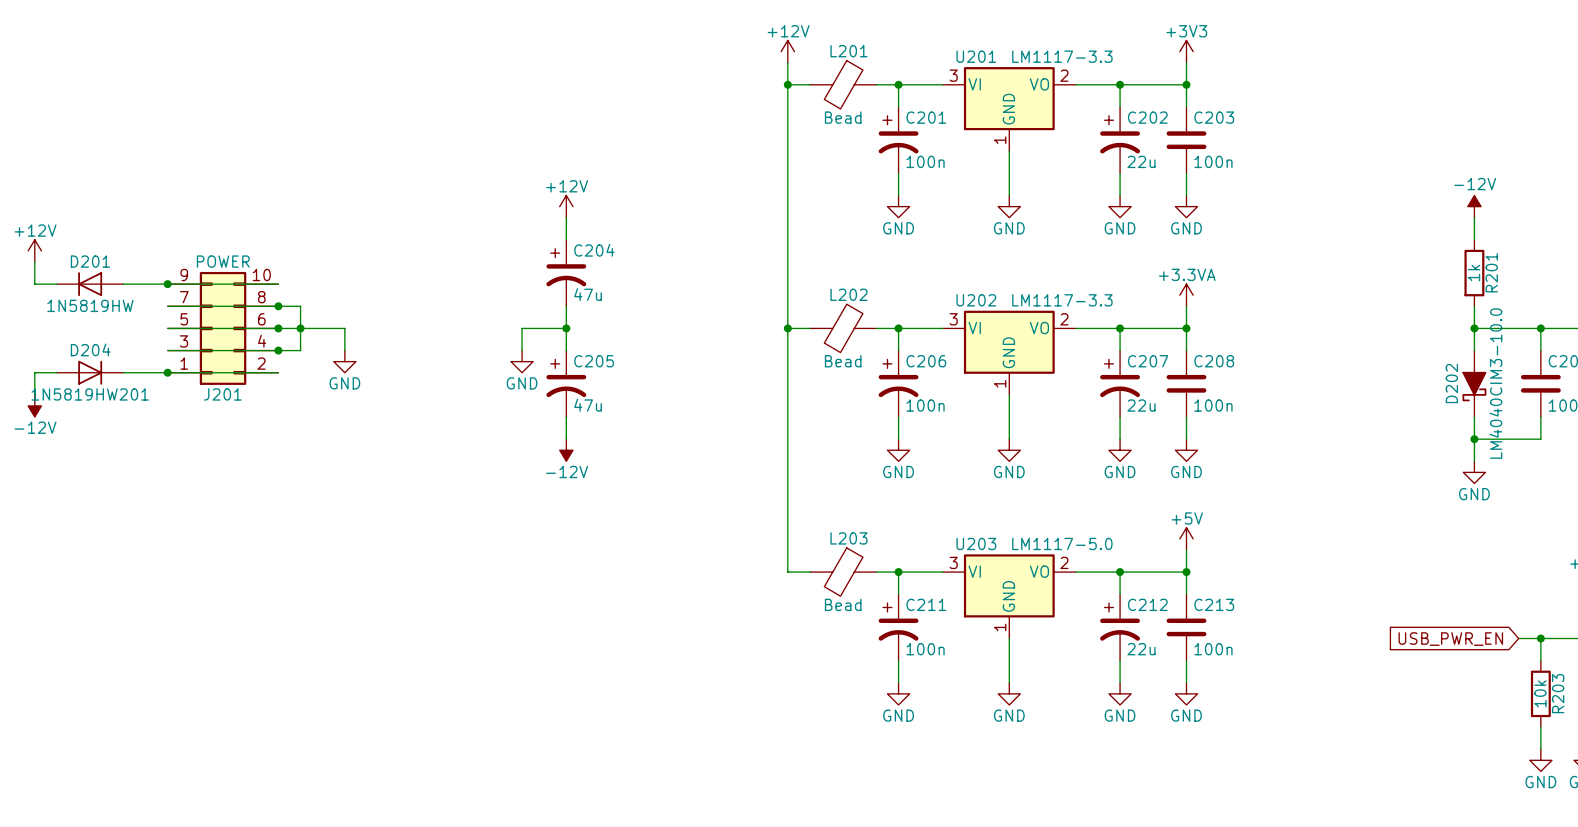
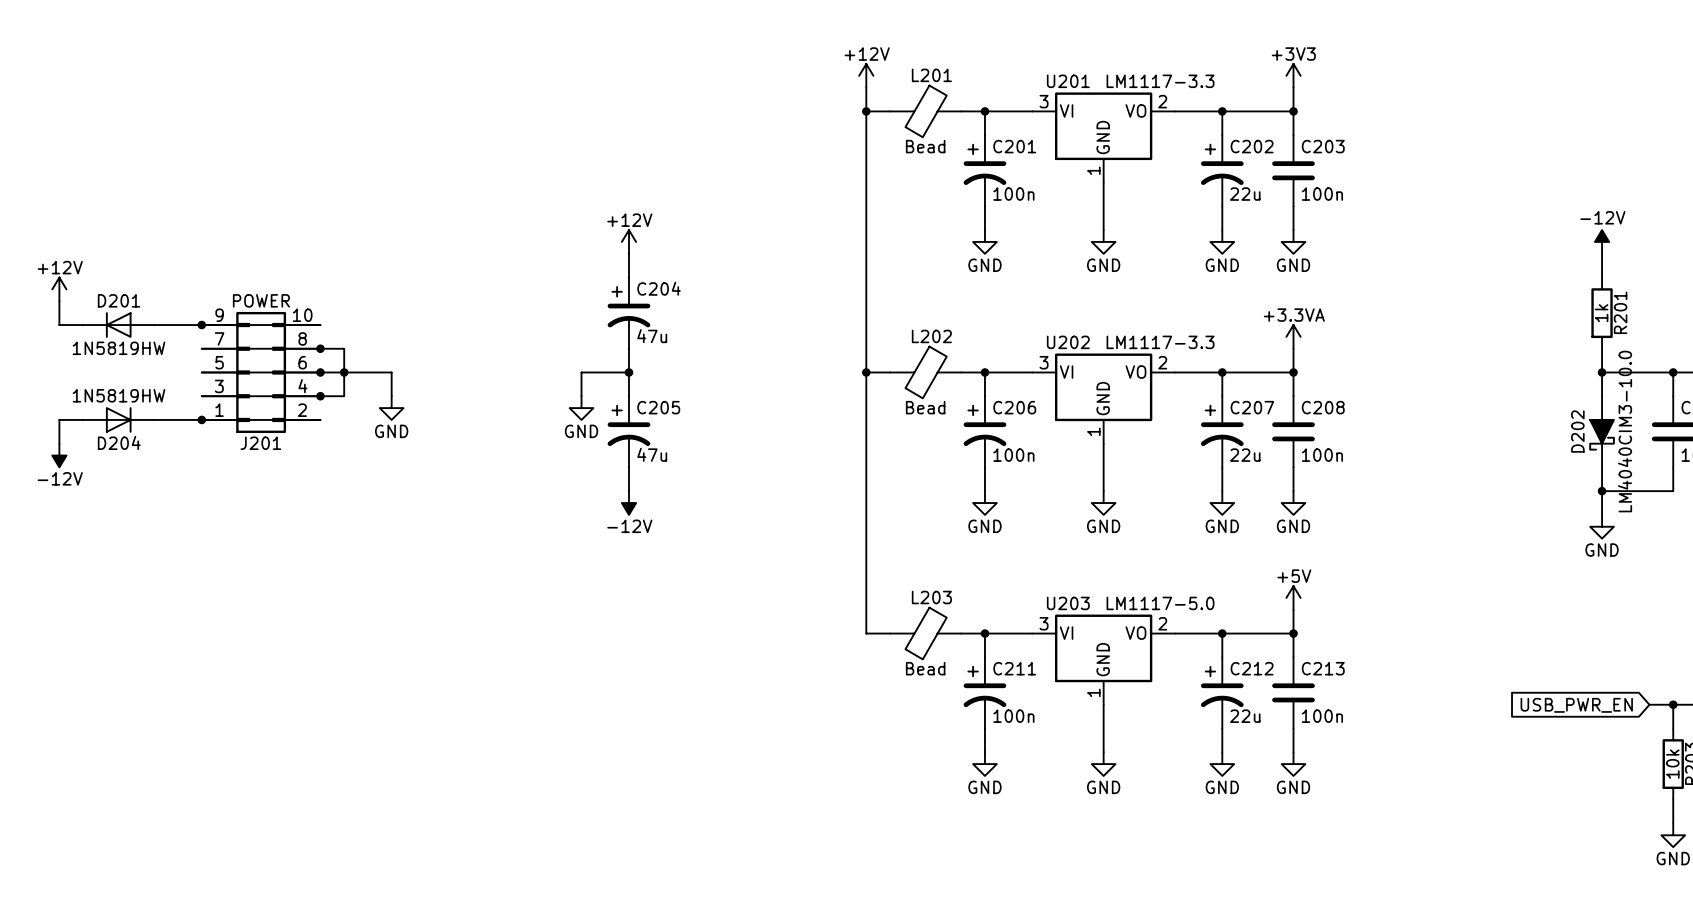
1N5819HW201 value: D204 (90, 349) -> 1N5819HW (119, 395)
1N5819HW201 name: 1N5819HW201 (90, 394) -> D204 (119, 442)

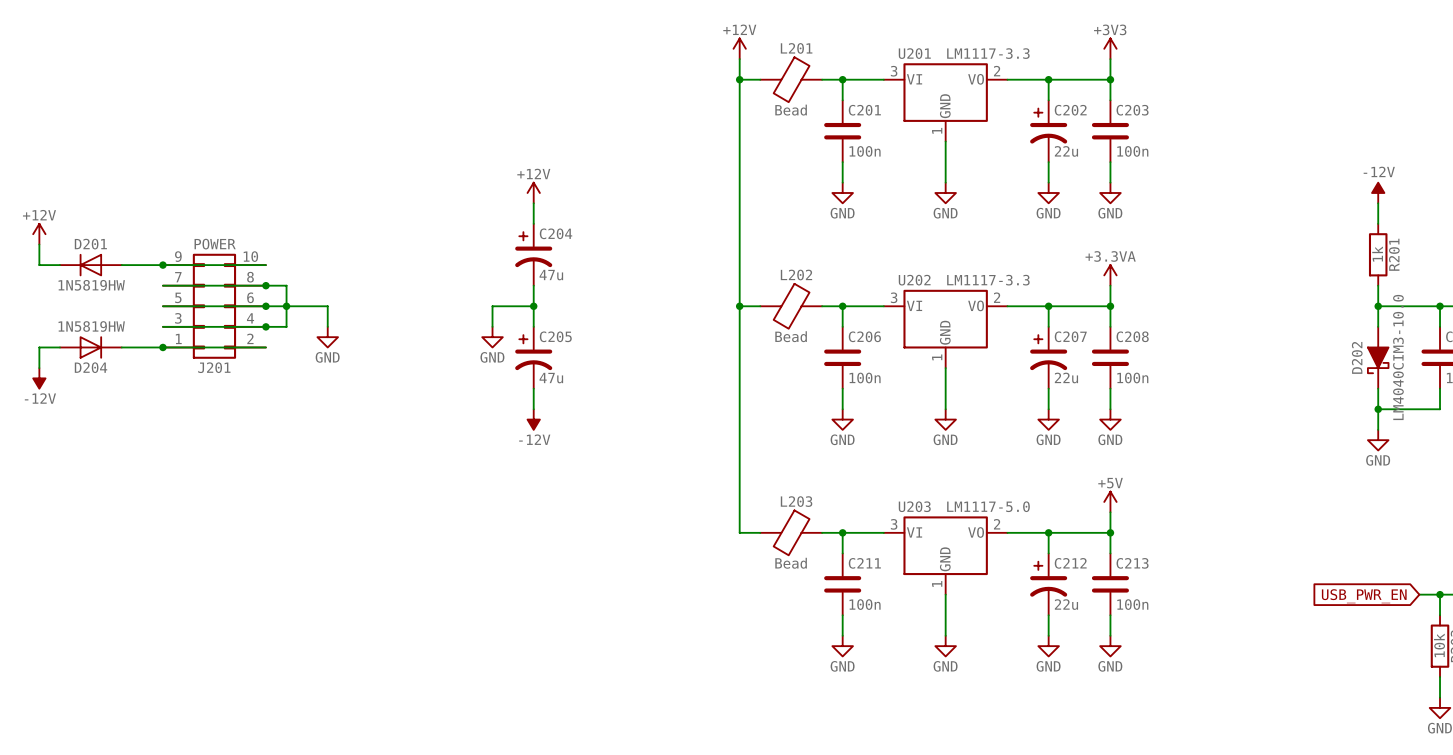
C201 symbol: [963, 135, 1007, 207] -> [824, 100, 862, 163]
C206 symbol: [963, 396, 1007, 468] -> [824, 326, 862, 389]
C211 symbol: [963, 657, 1007, 729] -> [824, 553, 862, 616]

